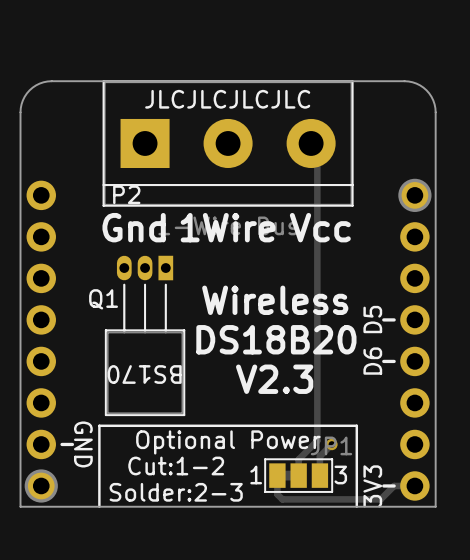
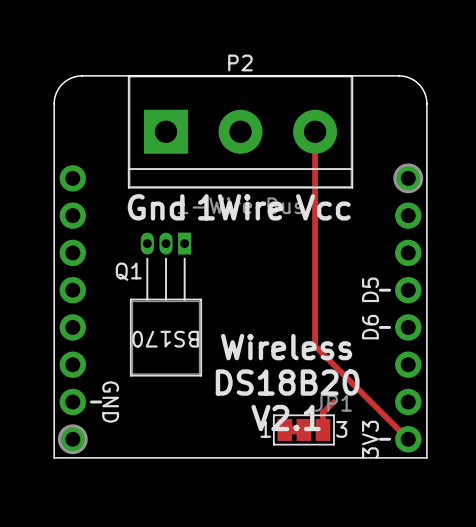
text: JLCJLCJLCJLC (227, 99) -> none
track: (311, 143) (317, 149) (317, 440) (298, 459) (298, 475) -> none
P2 name position: P2 (126, 194) -> P2 (240, 62)
text position: Wireless (275, 300) -> Wireless (286, 347)
text position: DS18B20 (276, 339) -> DS18B20 (287, 382)
text: V2.3 (274, 379) -> none
text: Optional Power (228, 442) -> none
via: (331, 444) -> none
text: none -> V2.1 (286, 417)
text: Cut:1-2 (176, 465) -> none
track: (277, 475) (277, 494) (282, 499) (380, 499) (394, 485) (414, 485) -> (315, 122) (315, 346) (408, 439)
text: Solder:2-3 (176, 492) -> none
line: (99, 506) (99, 425) (356, 425) (356, 506) -> none

